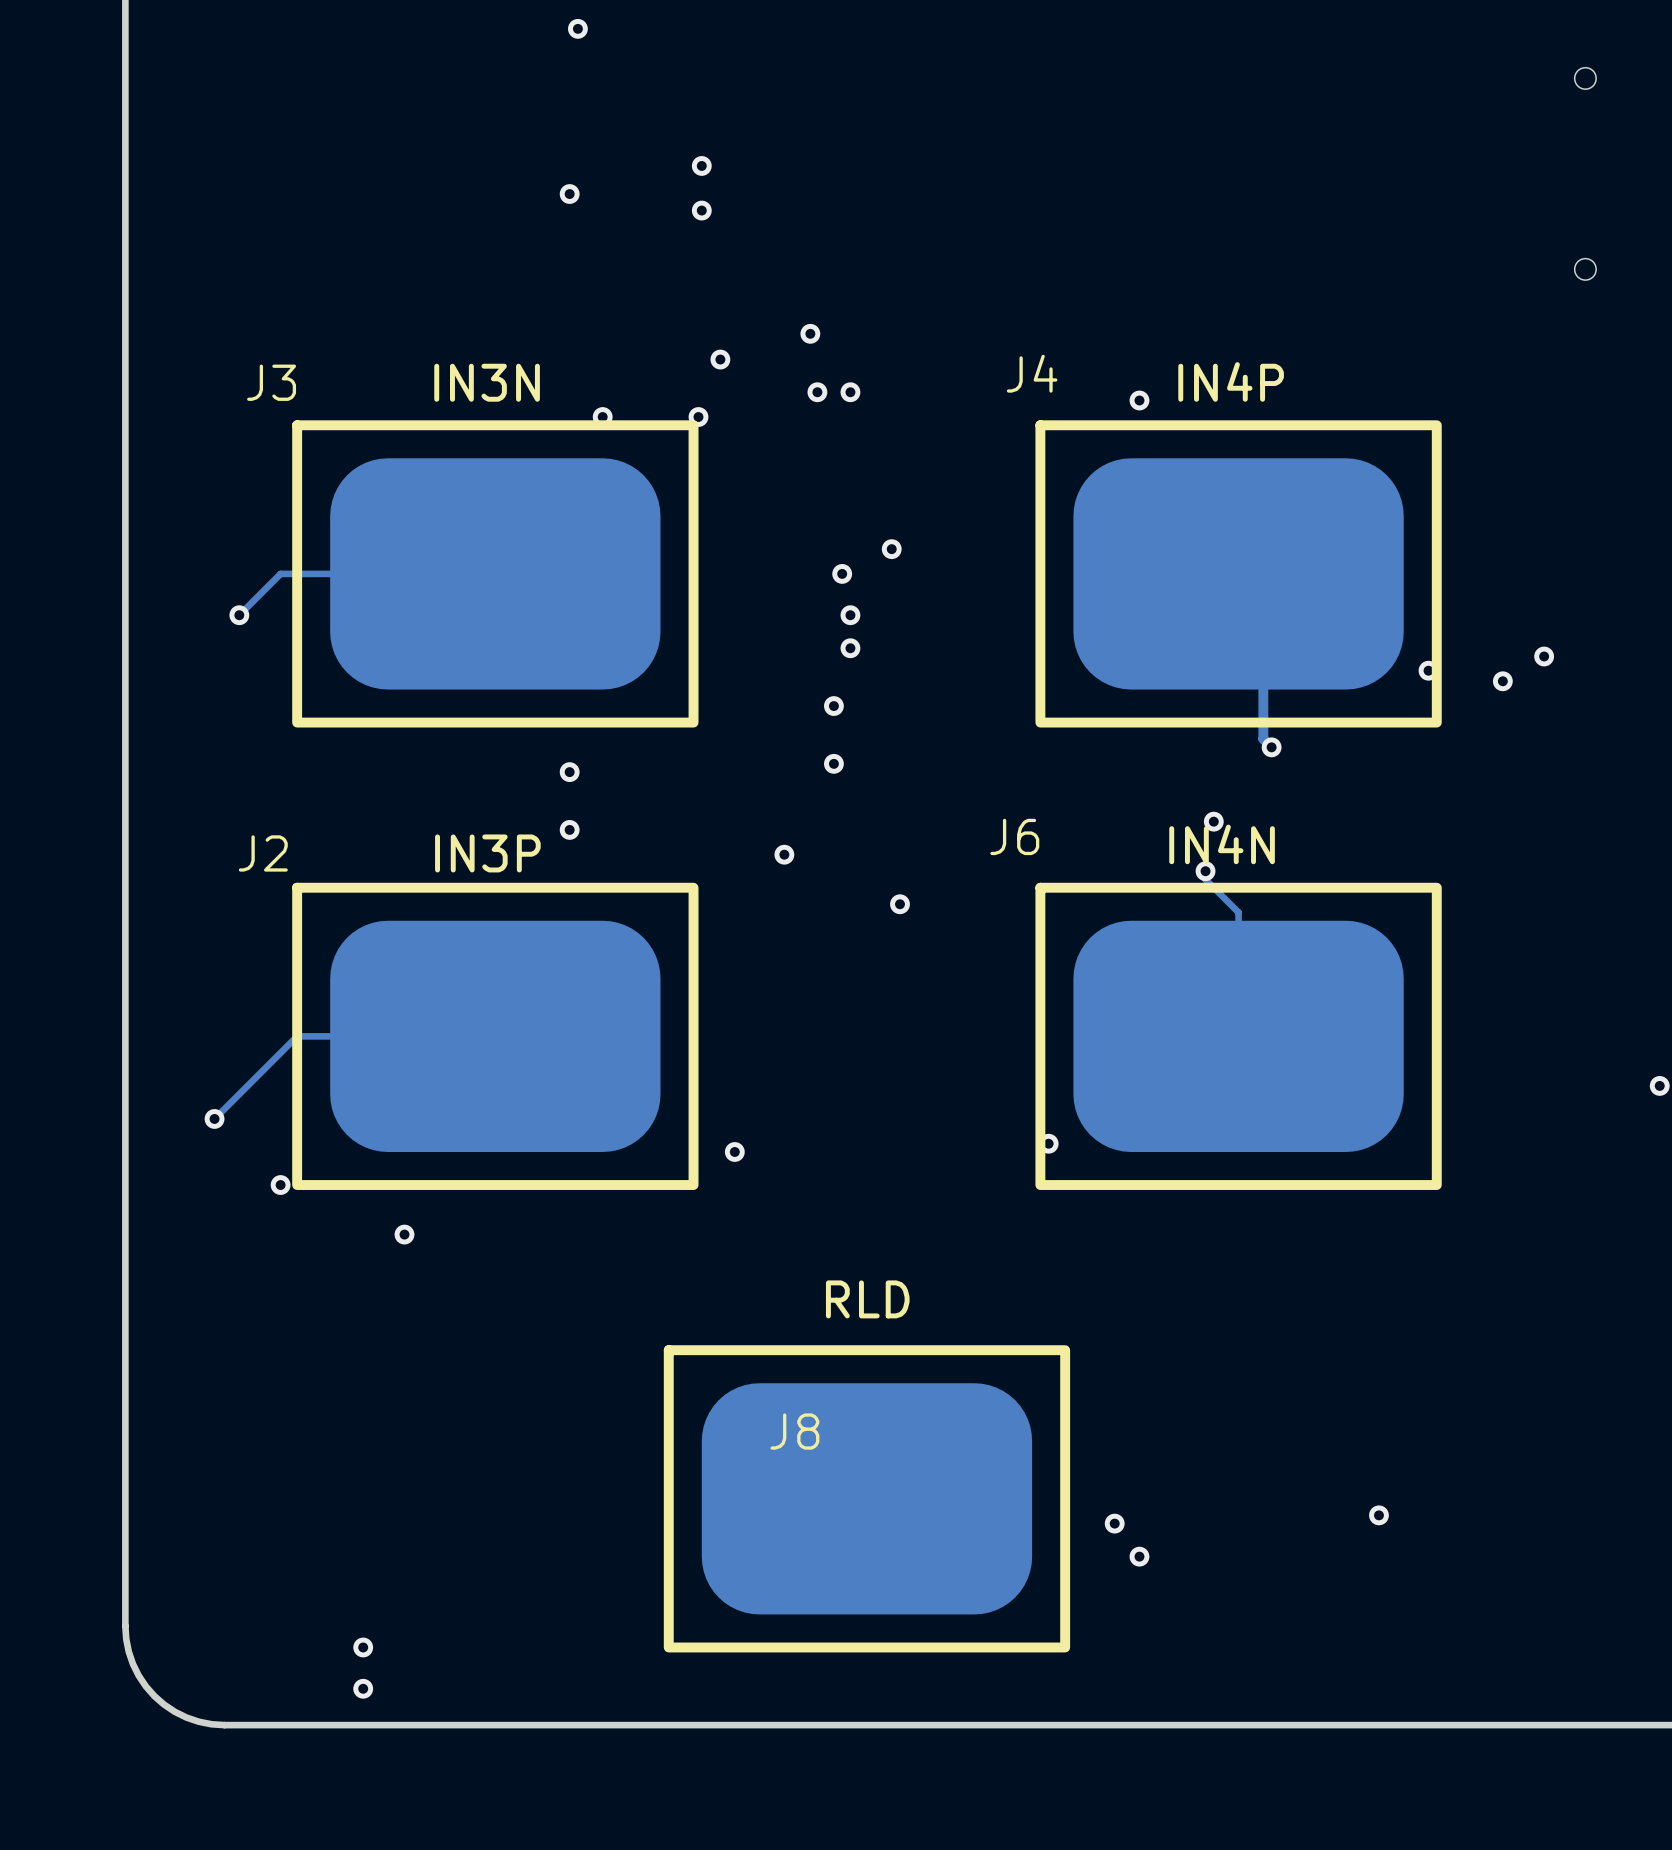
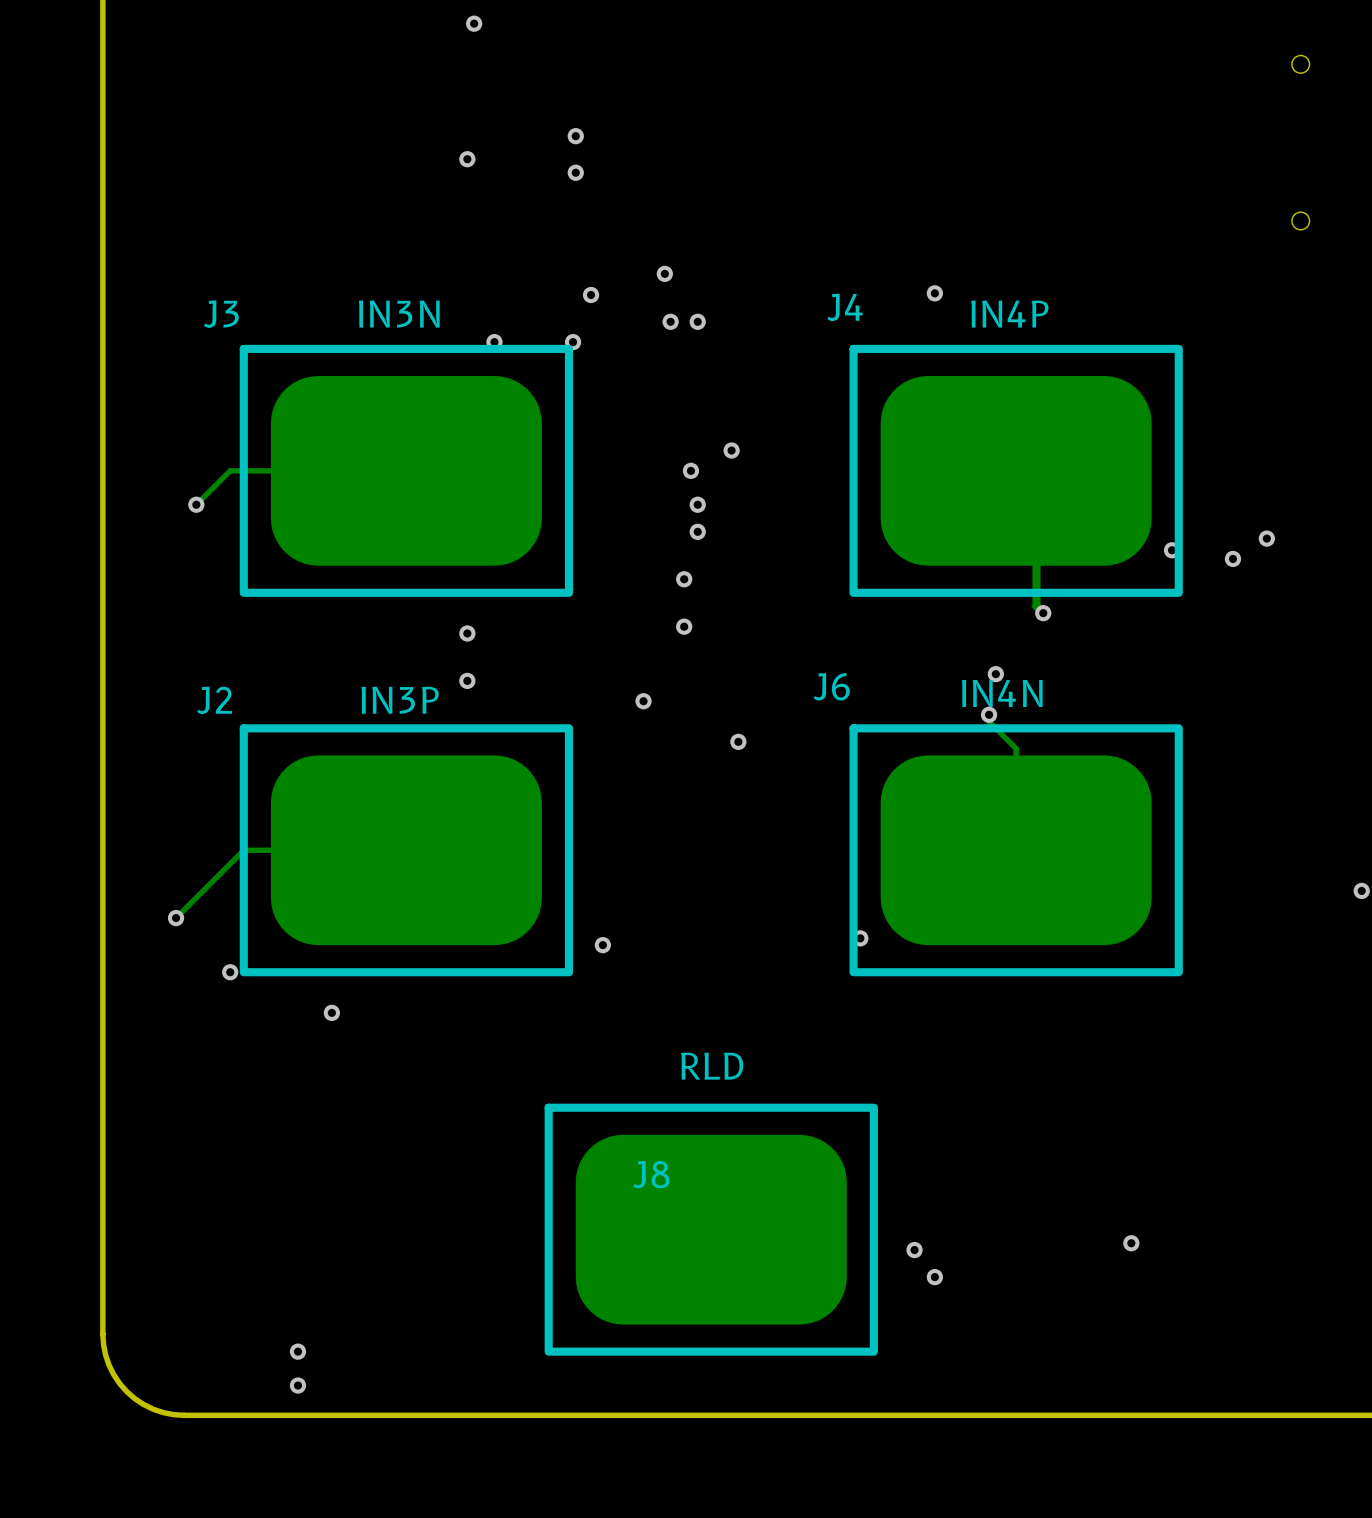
via position: (1139, 400) -> (934, 293)

